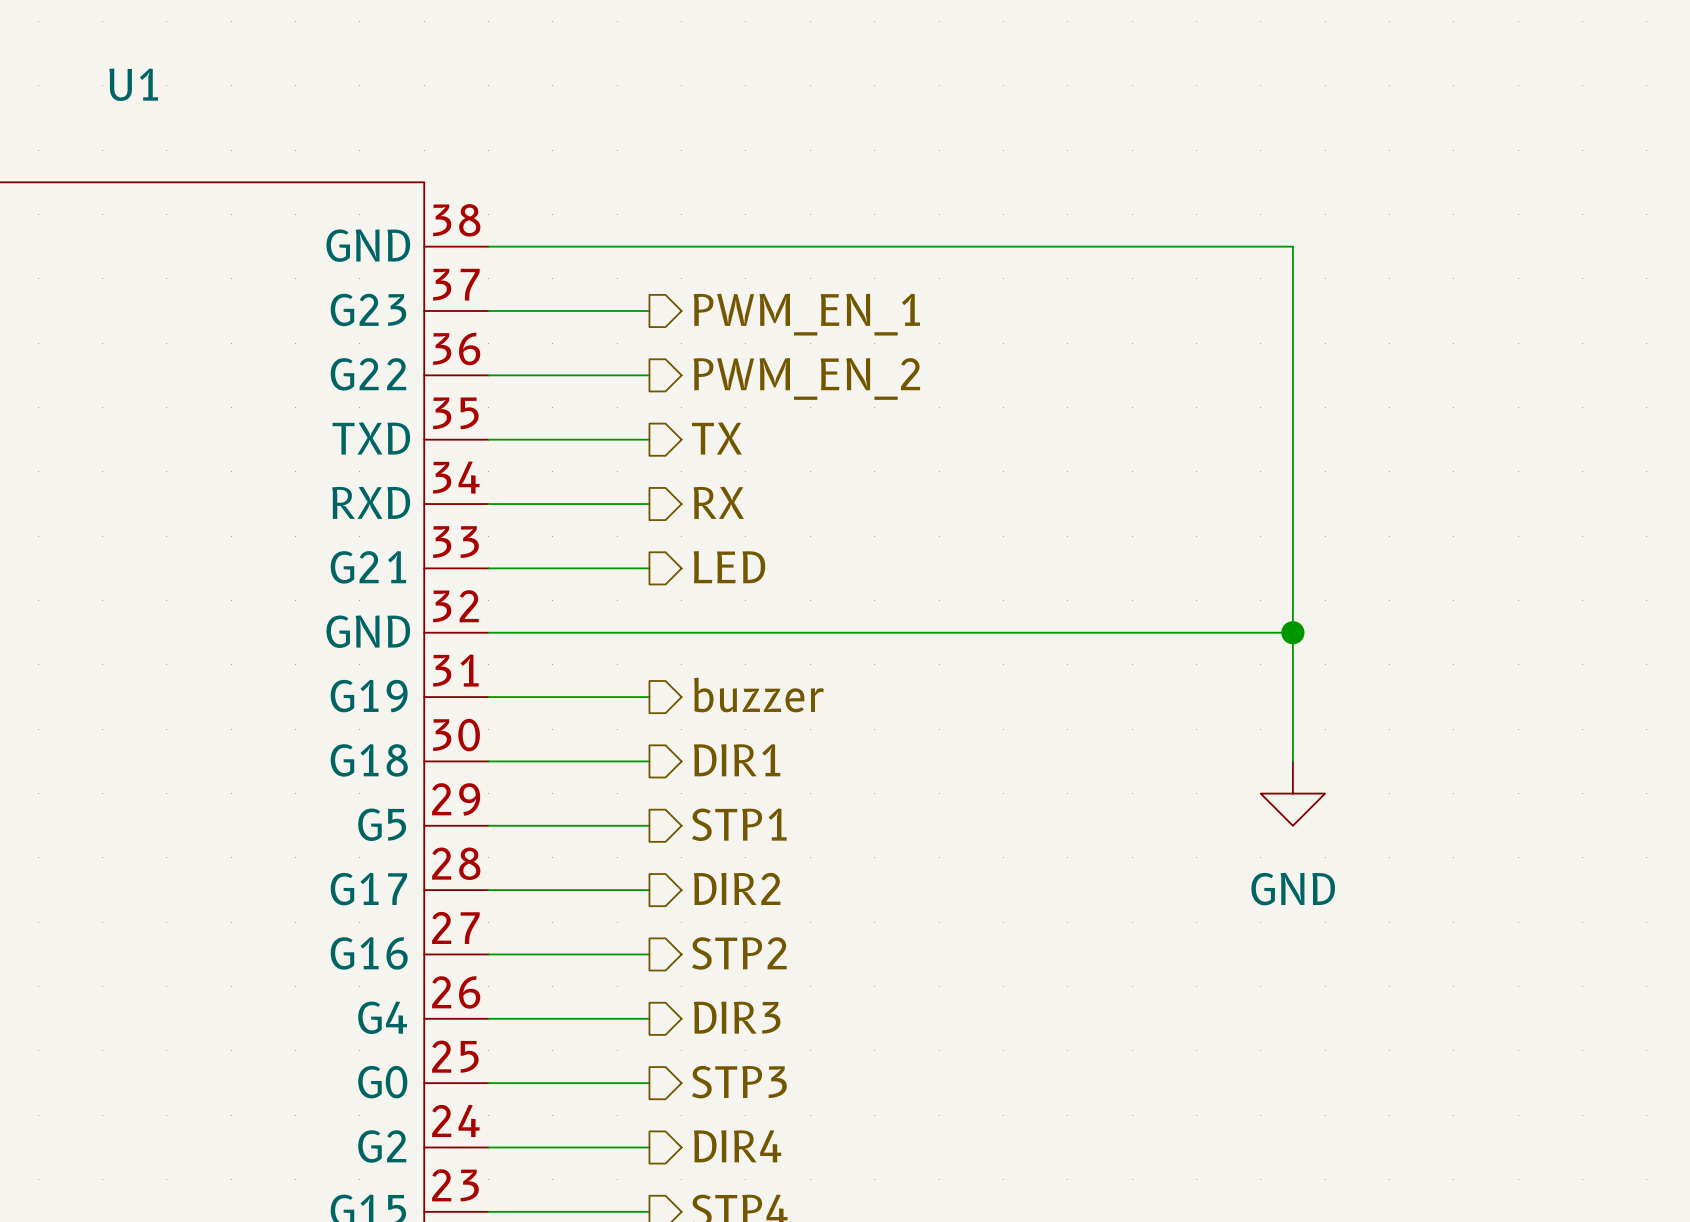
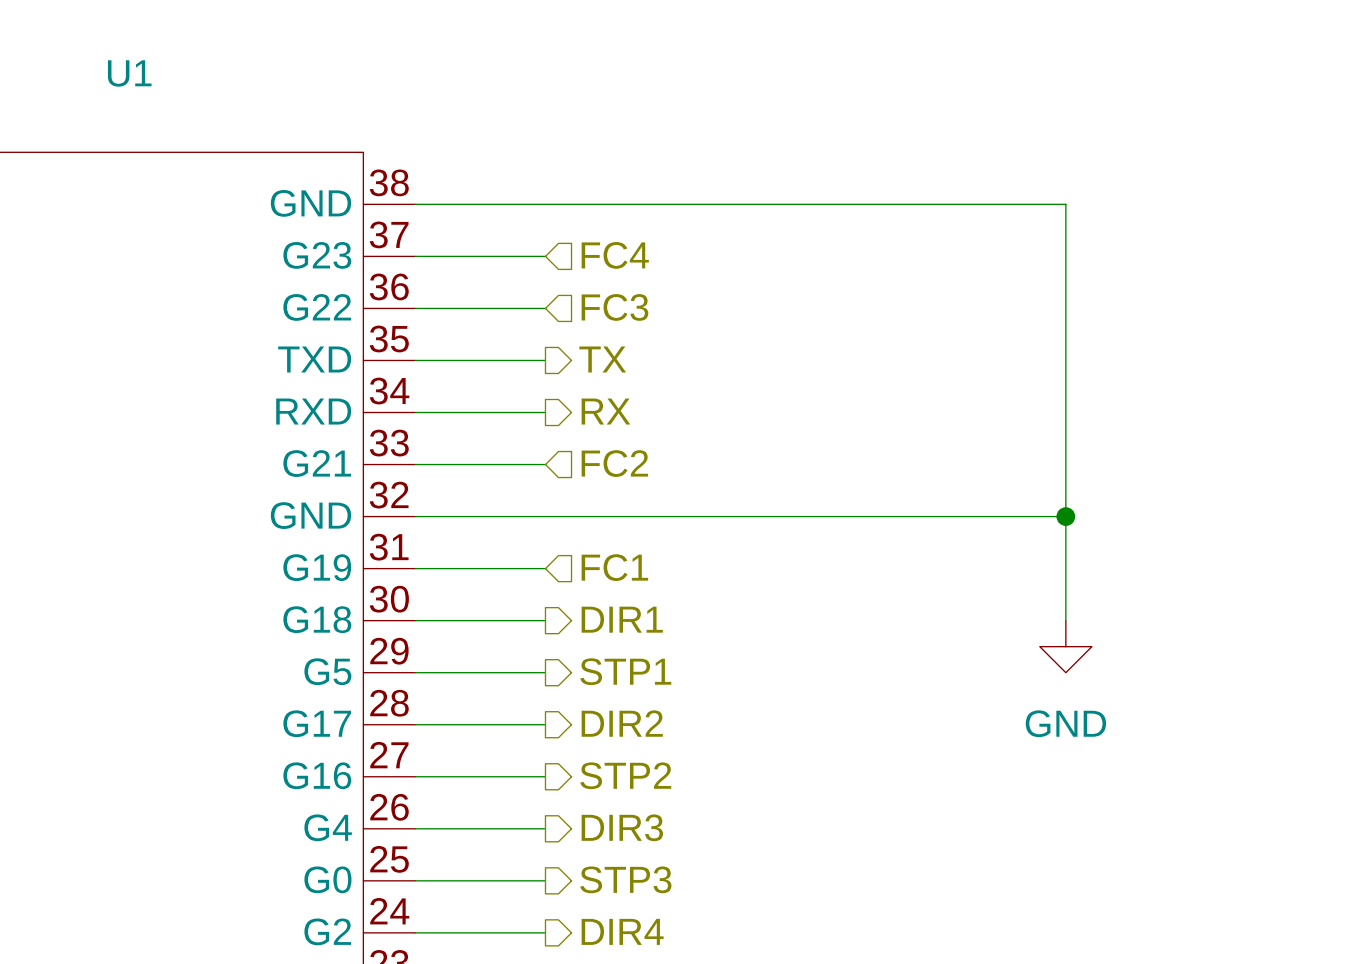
hierarchical label shape: output (806, 314) -> input (615, 255)
hierarchical label: PWM_EN_1 (806, 314) -> FC4 (615, 255)
hierarchical label shape: output (806, 378) -> input (614, 307)
hierarchical label: PWM_EN_2 (806, 378) -> FC3 (614, 307)
hierarchical label shape: output (729, 567) -> input (614, 463)
hierarchical label: LED (729, 567) -> FC2 (614, 463)
hierarchical label shape: output (758, 694) -> input (614, 567)
hierarchical label: buzzer (758, 694) -> FC1 (614, 567)

